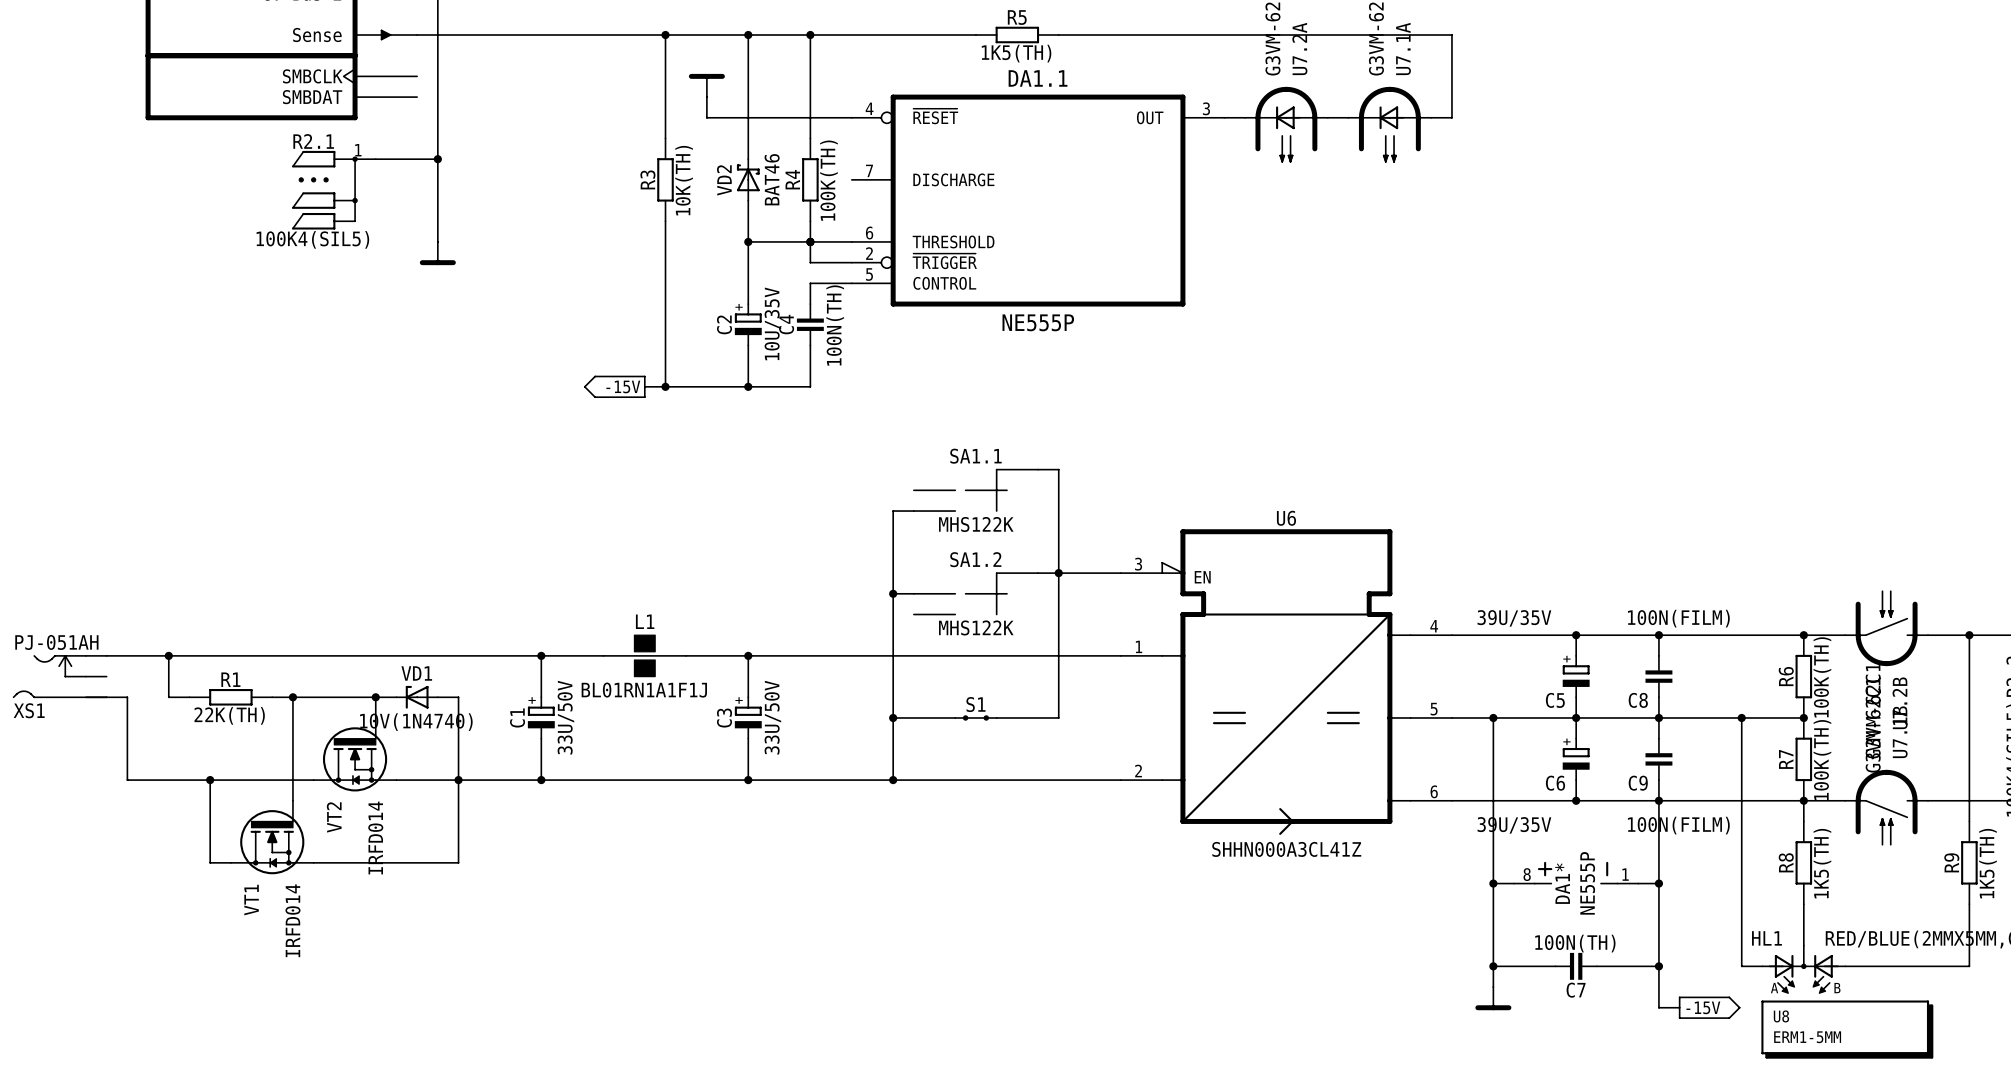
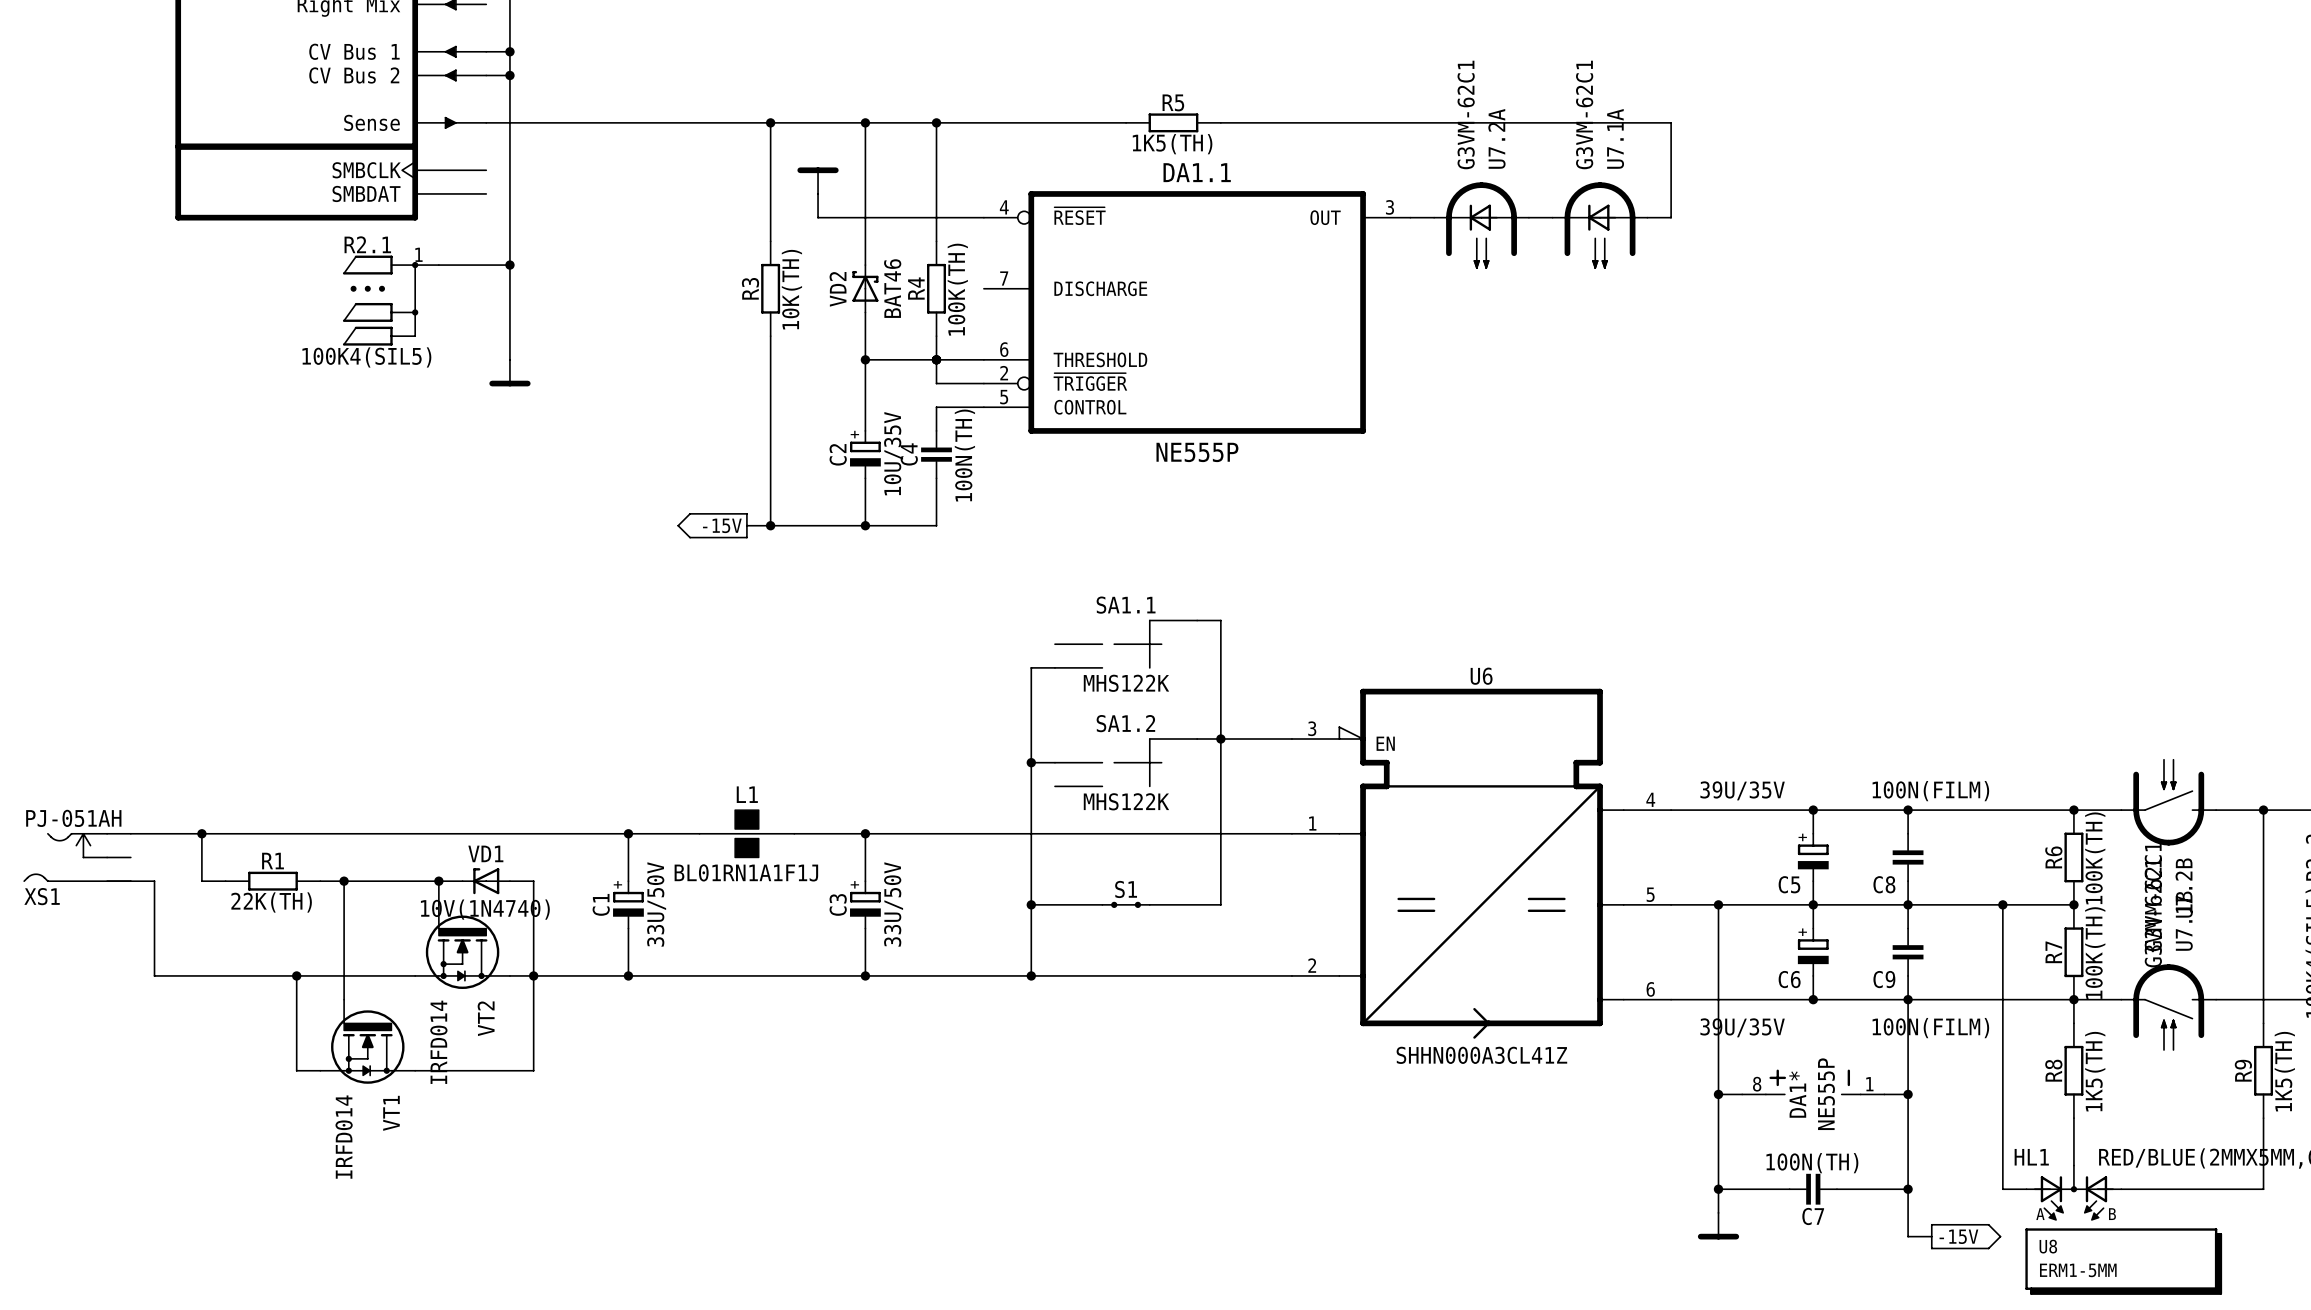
VT2 flip: as is (355, 759) -> left-right (462, 952)
wire: (210, 780) (210, 862) (230, 862) -> (296, 975) (296, 1070) (320, 1070)
junction position: (210, 780) -> (296, 975)
VT1 flip: as is (272, 842) -> left-right (367, 1047)

